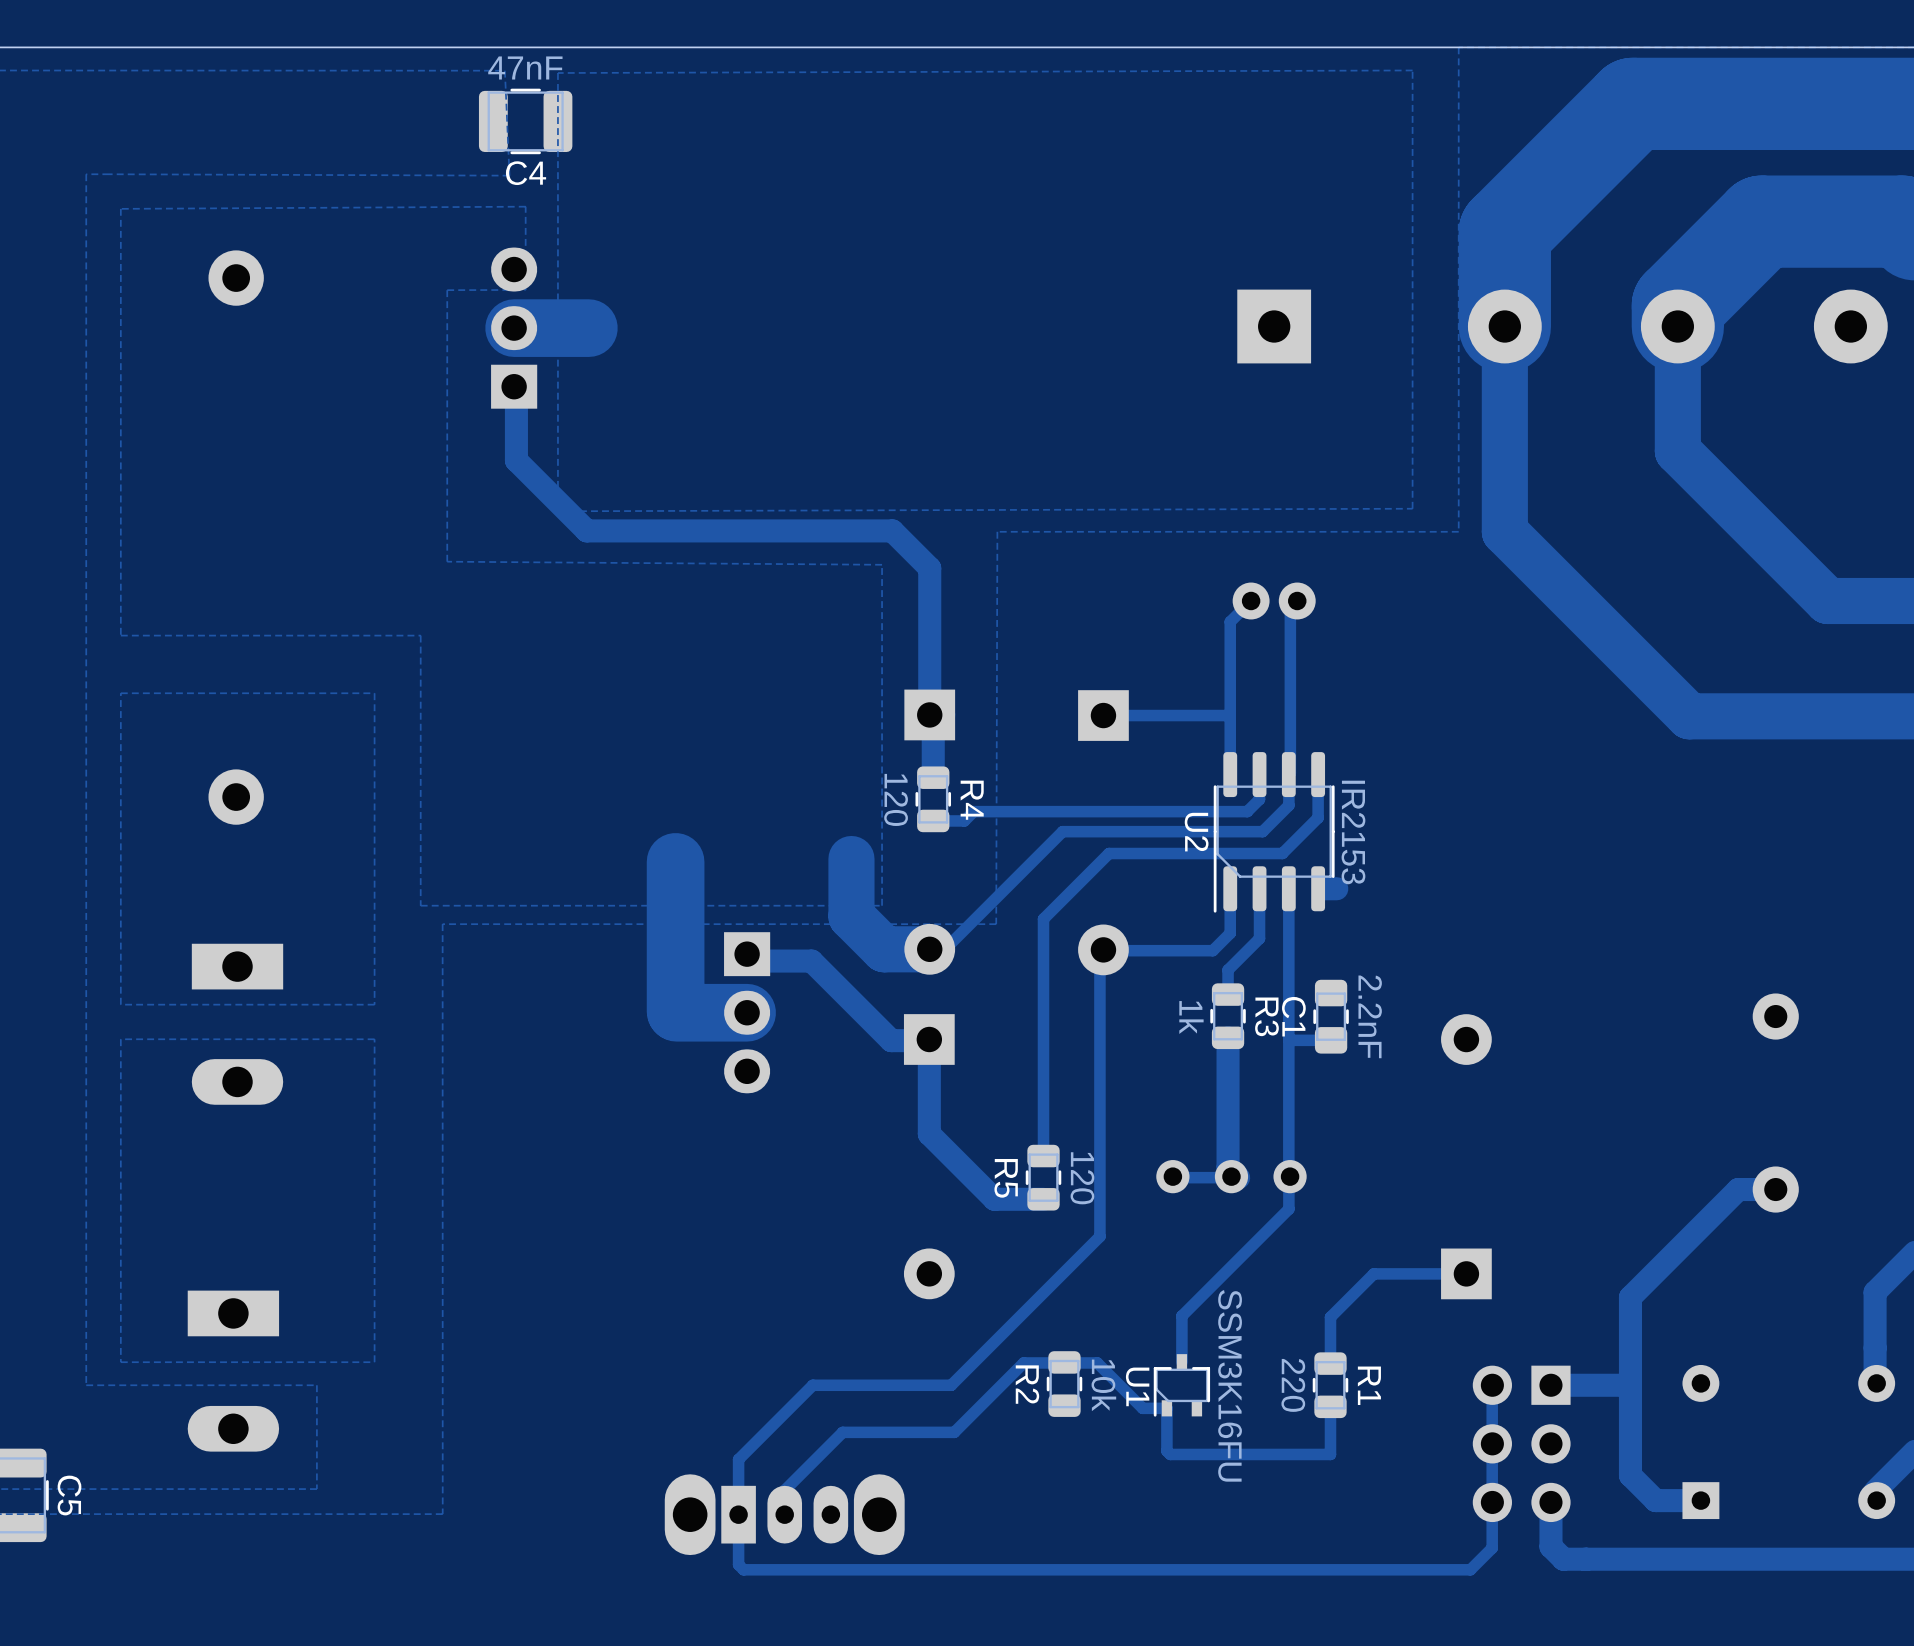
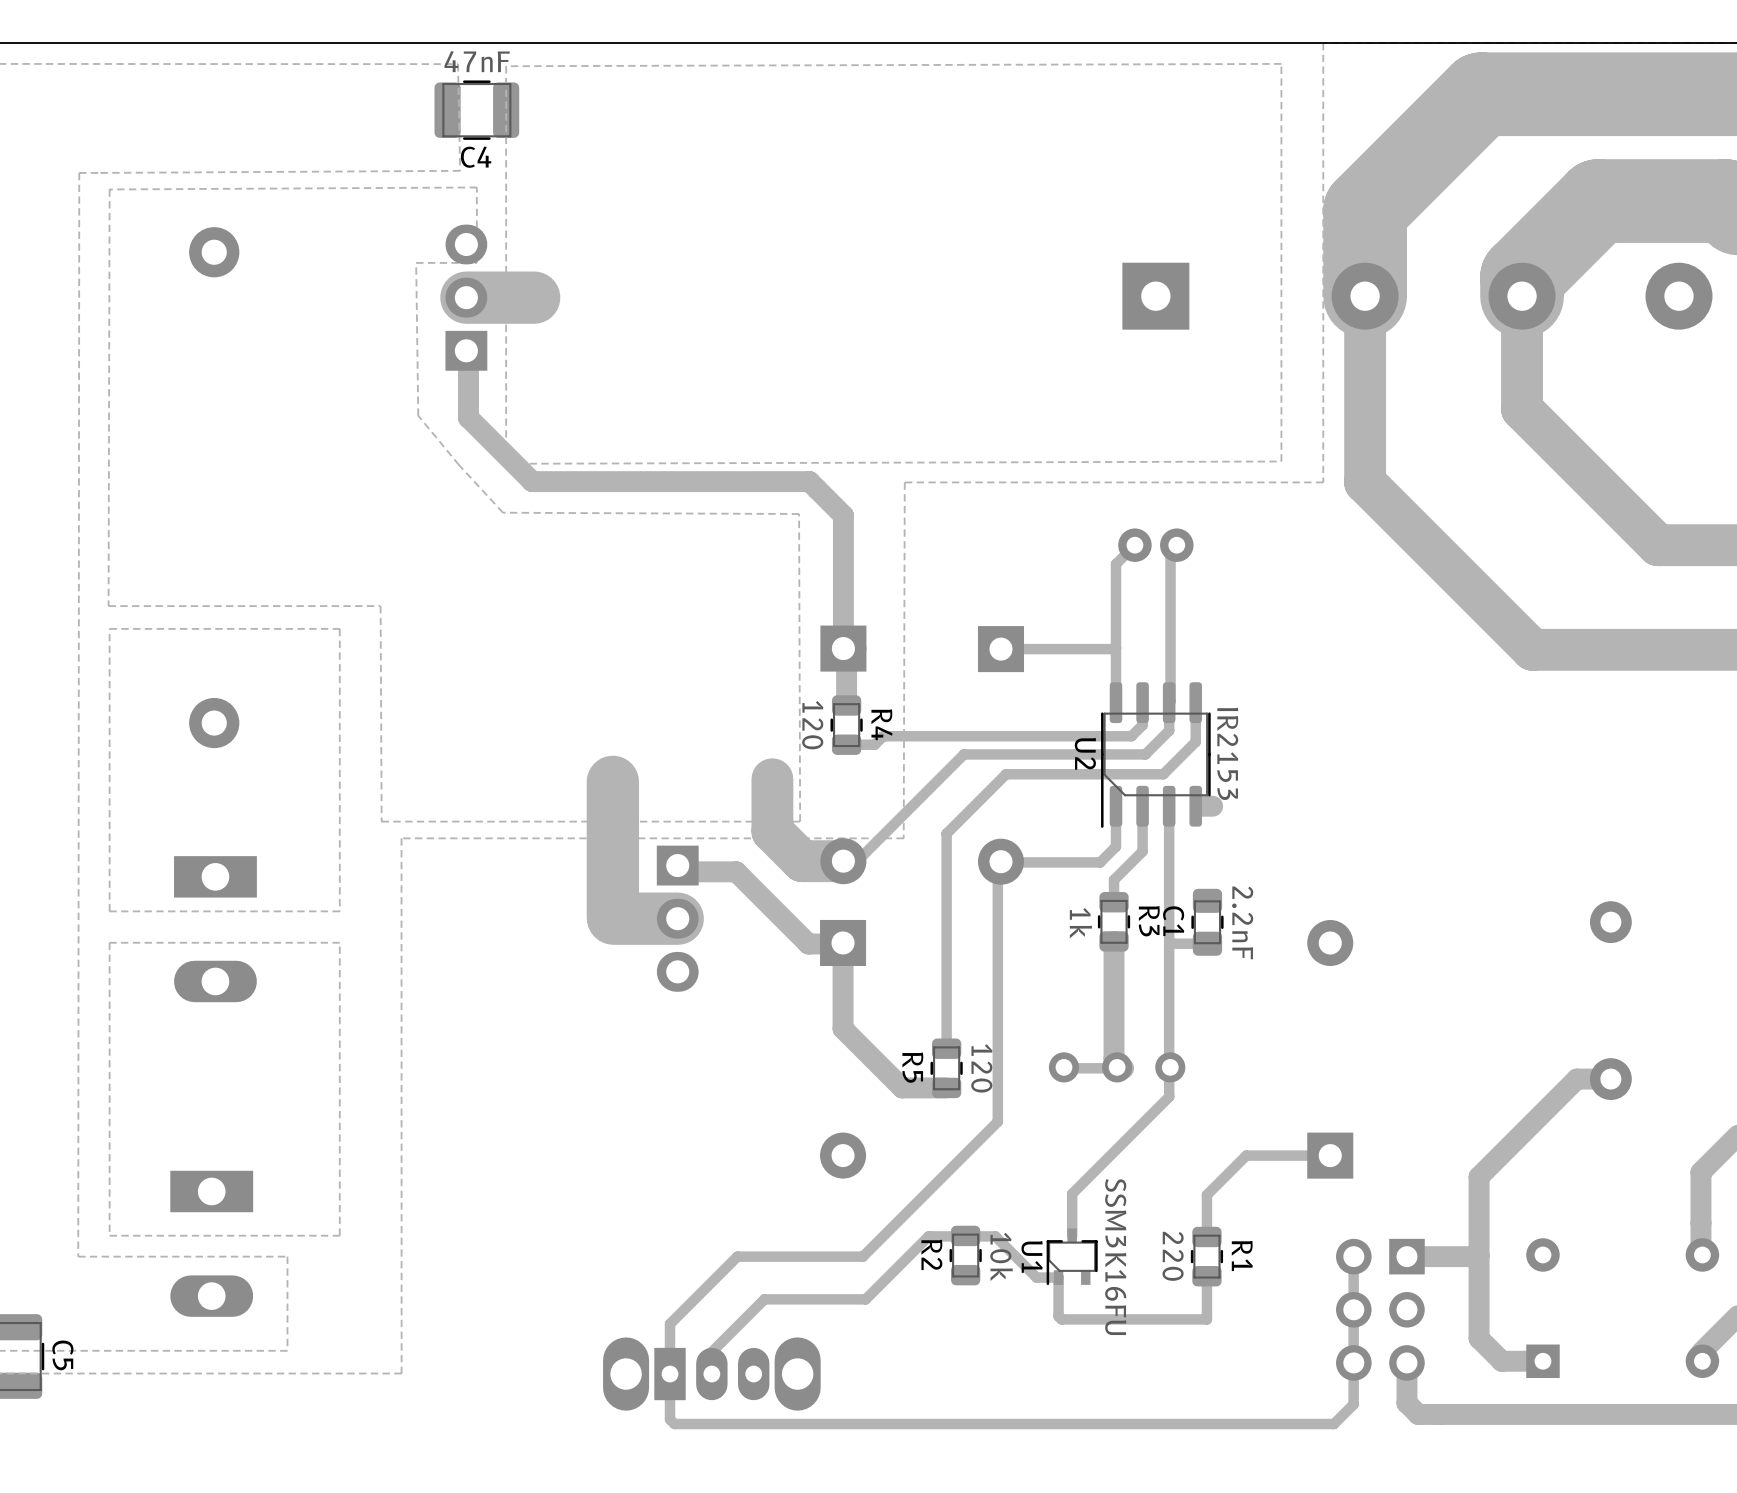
zone outline: (504, 70) (509, 175) (86, 174) (86, 1385) -> (458, 64) (460, 170) (79, 172) (78, 1256)
zone outline: (120, 208) (120, 635) (420, 635) (420, 905) -> (109, 189) (108, 606) (380, 606) (381, 821)
zone outline: (525, 289) (447, 290) (447, 561) (882, 564) (882, 905) -> (476, 263) (416, 262) (418, 415) (459, 465) (503, 512) (799, 514) (800, 821)

